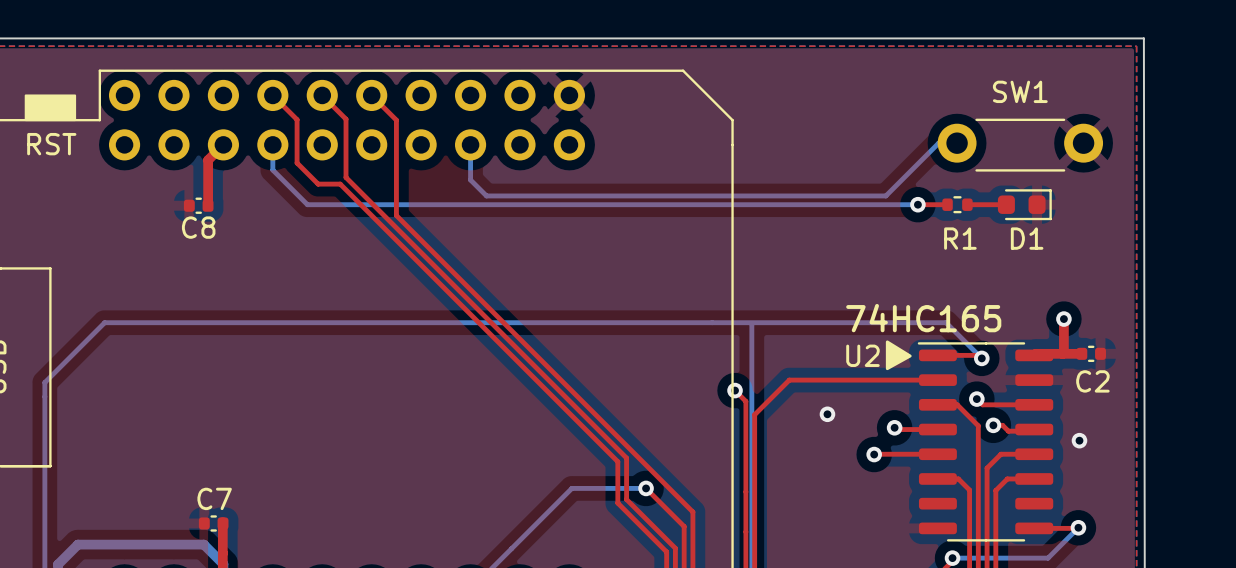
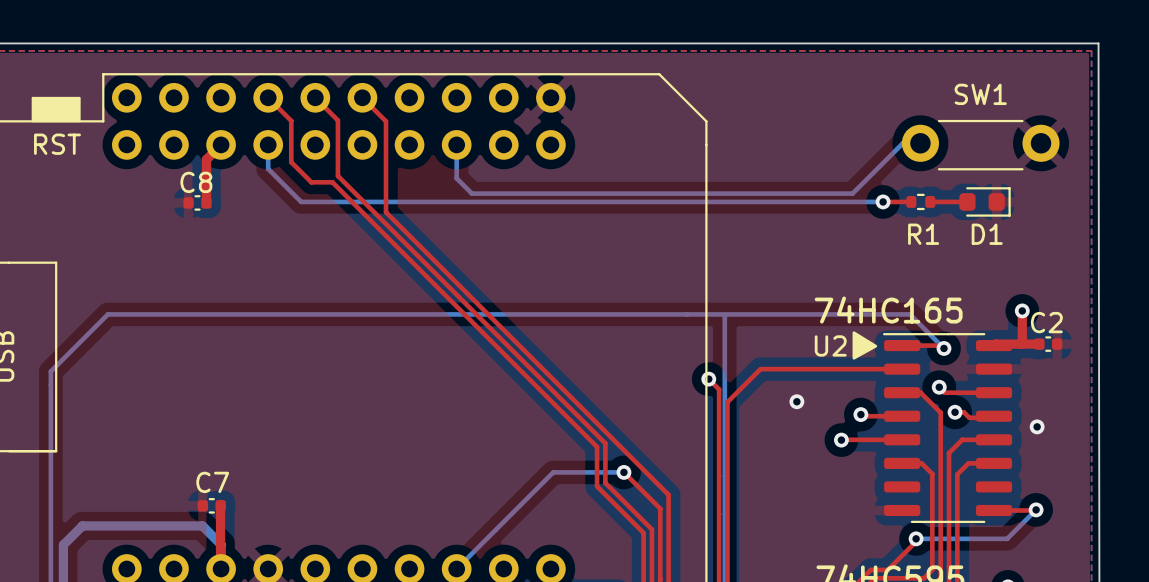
C8 name position: C8 (198, 227) -> C8 (196, 182)
C2 name position: C2 (1092, 381) -> C2 (1046, 322)

